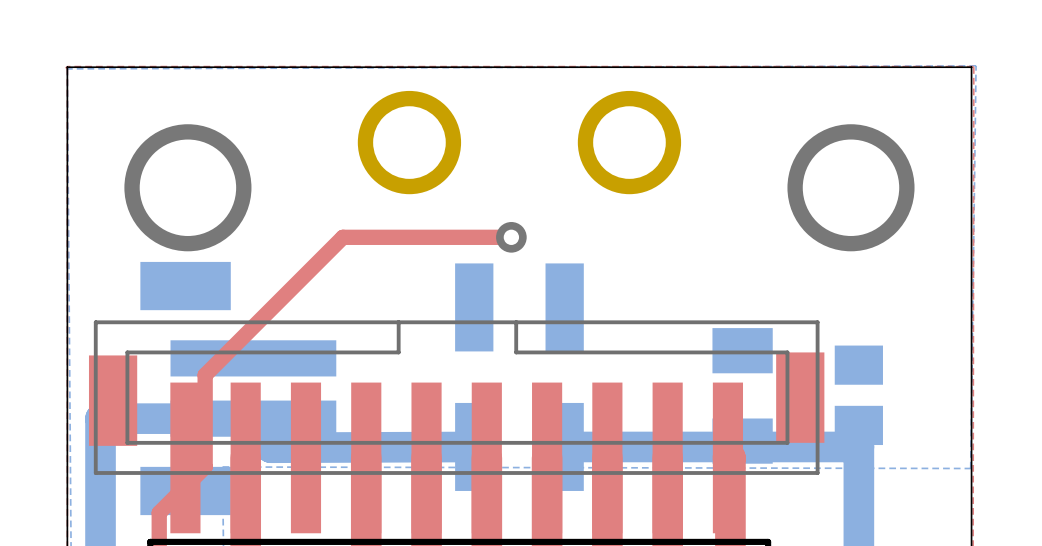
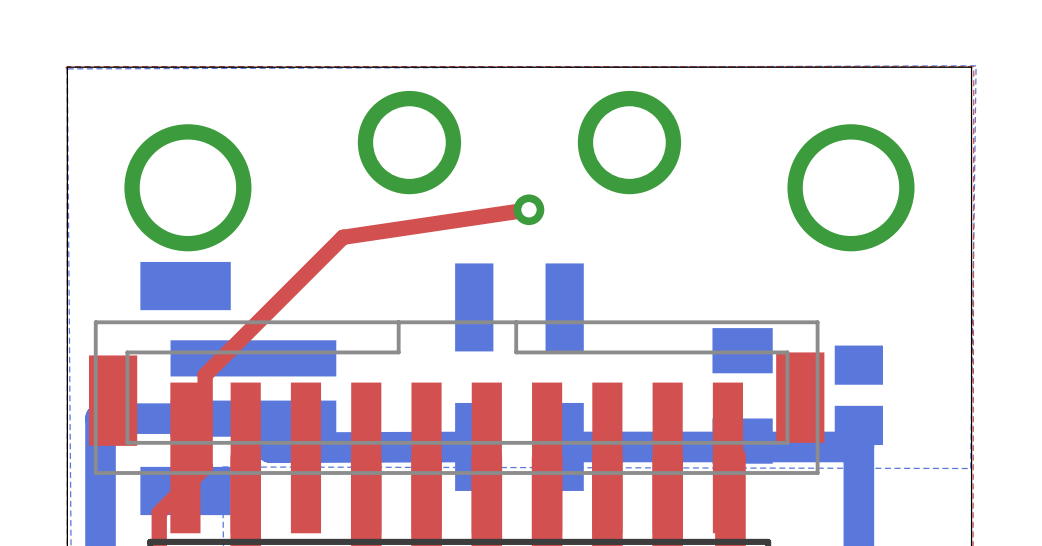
top track: (342, 237) (511, 237) -> (342, 237) (528, 209)
via position: (511, 237) -> (528, 209)

